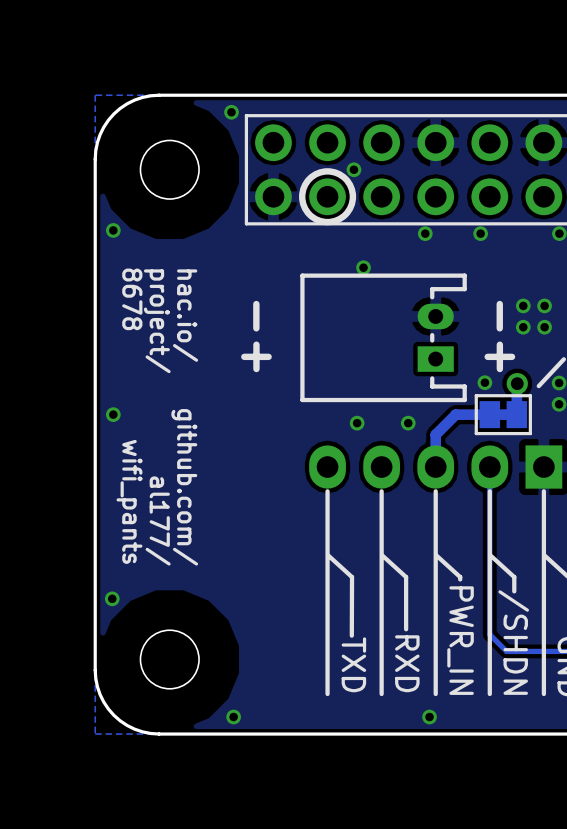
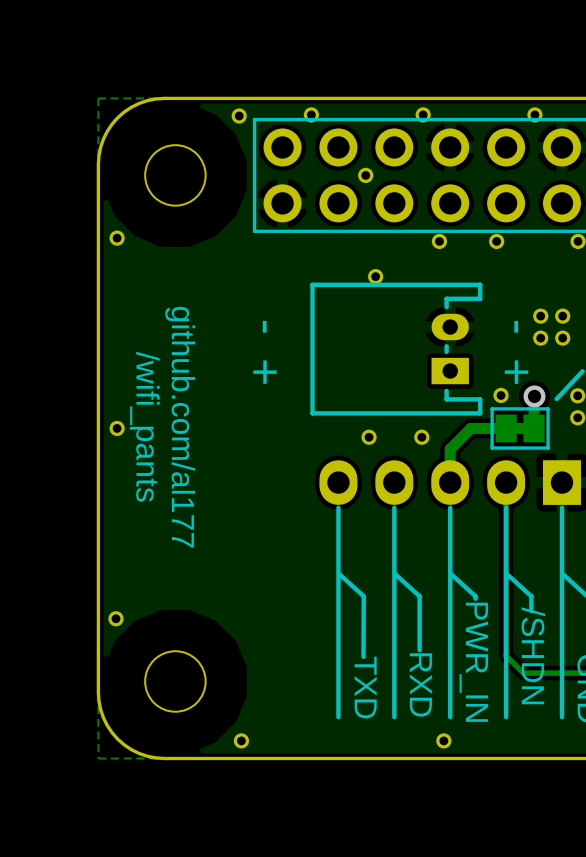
part: none -> (311, 114)
part: none -> (423, 114)
part: none -> (534, 114)
drawing: [299, 168, 357, 226] -> none
text: 8678 (132, 299) -> none
text: hac.io/ (185, 315) -> none
text: project/ (157, 321) -> none
text: github.com/ (184, 487) -> github.com/al177 (180, 427)
text: wifi_pants (129, 501) -> /wifi_pants (144, 426)
text: al177/ (158, 520) -> none

